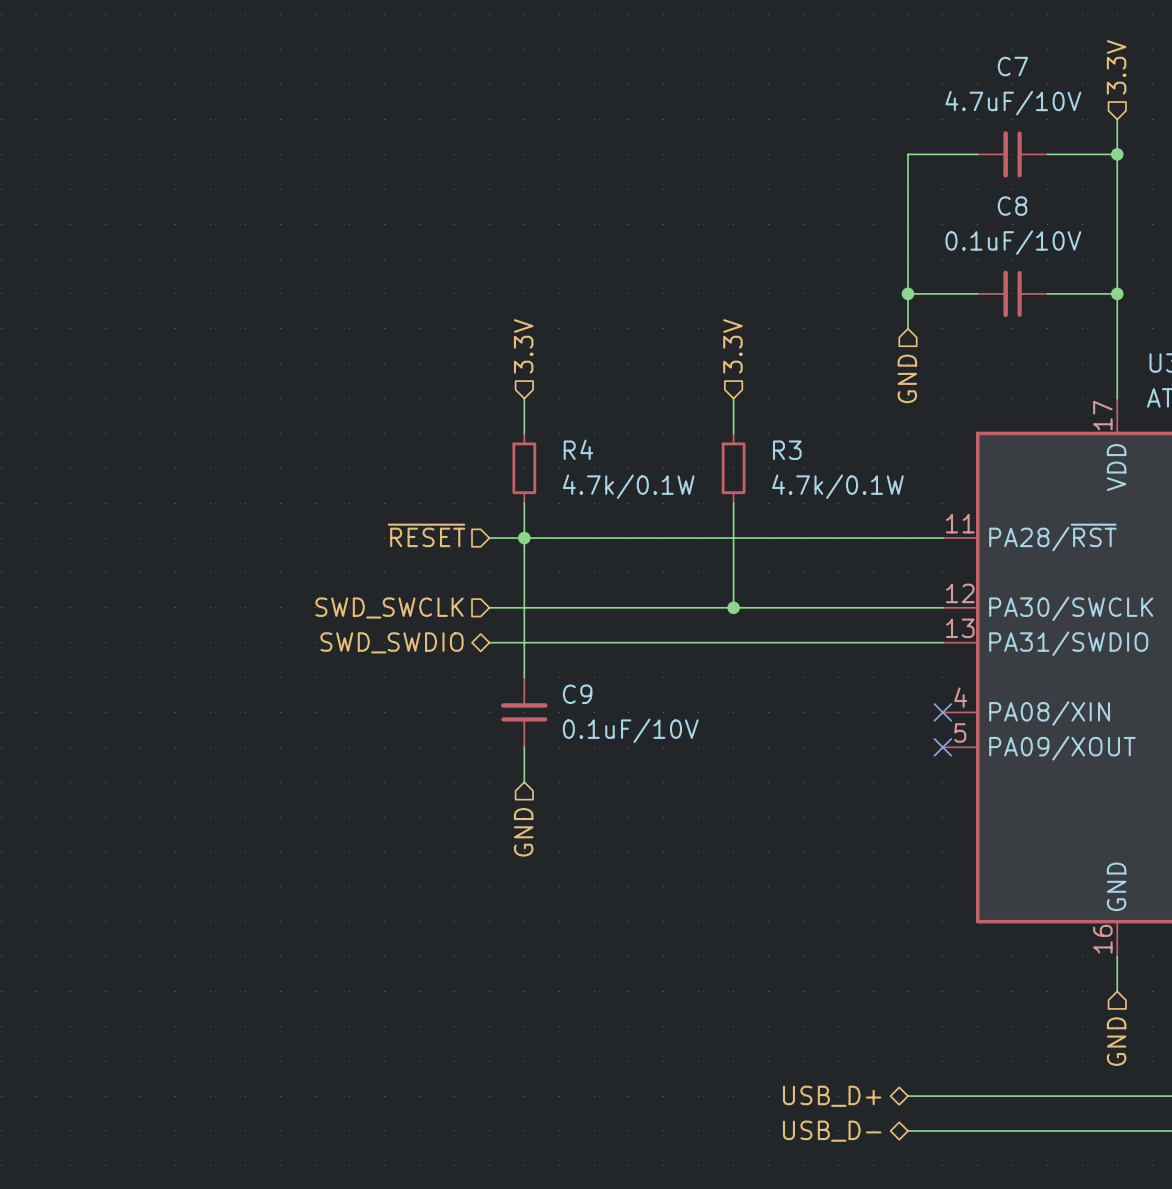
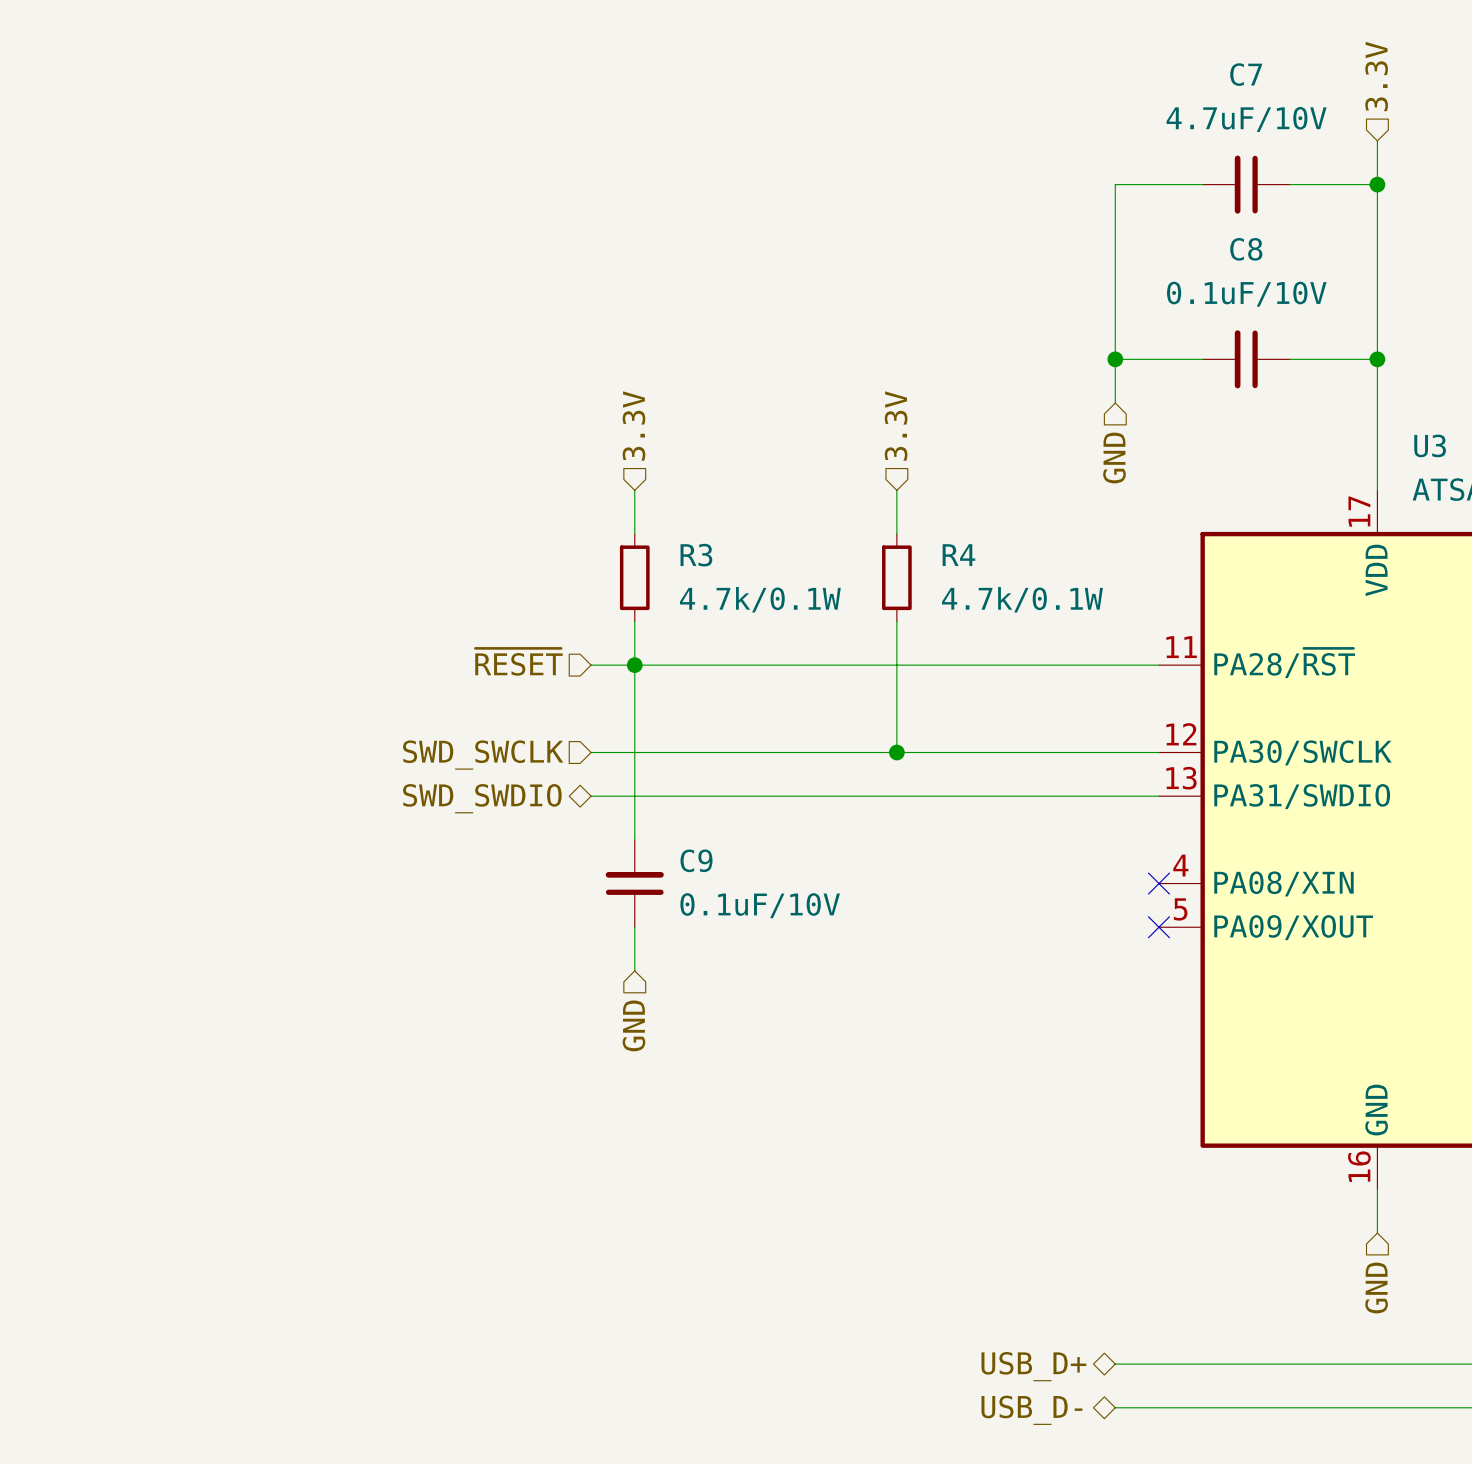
R4 name: R4 (578, 449) -> R3 (696, 555)
R3 name: R3 (787, 450) -> R4 (958, 555)

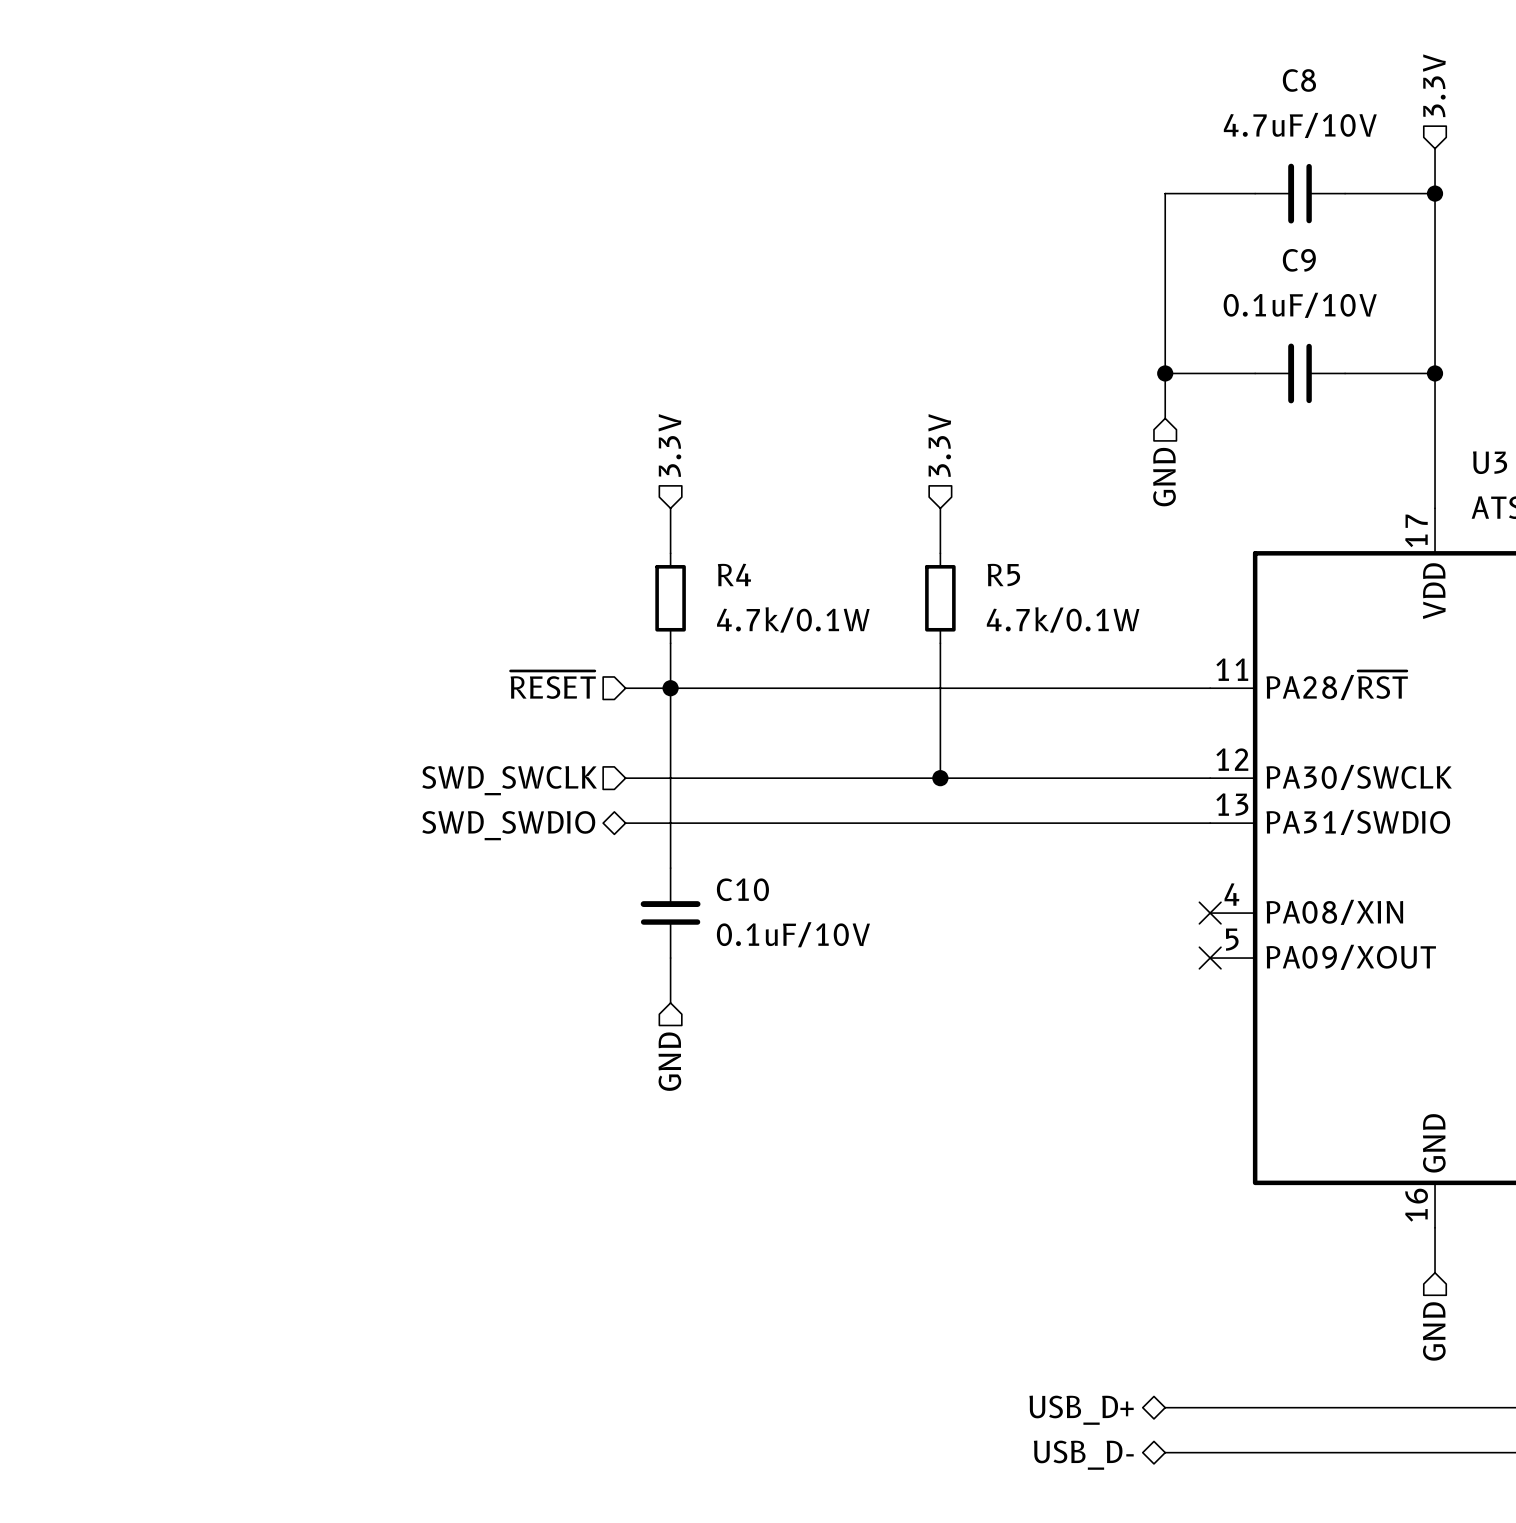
C7 name: C7 (1246, 74) -> C8 (1299, 80)
C8 name: C8 (1246, 249) -> C9 (1299, 260)
R3 name: R3 (696, 555) -> R4 (734, 574)
R4 name: R4 (958, 555) -> R5 (1003, 575)
C9 name: C9 (696, 860) -> C10 (742, 889)

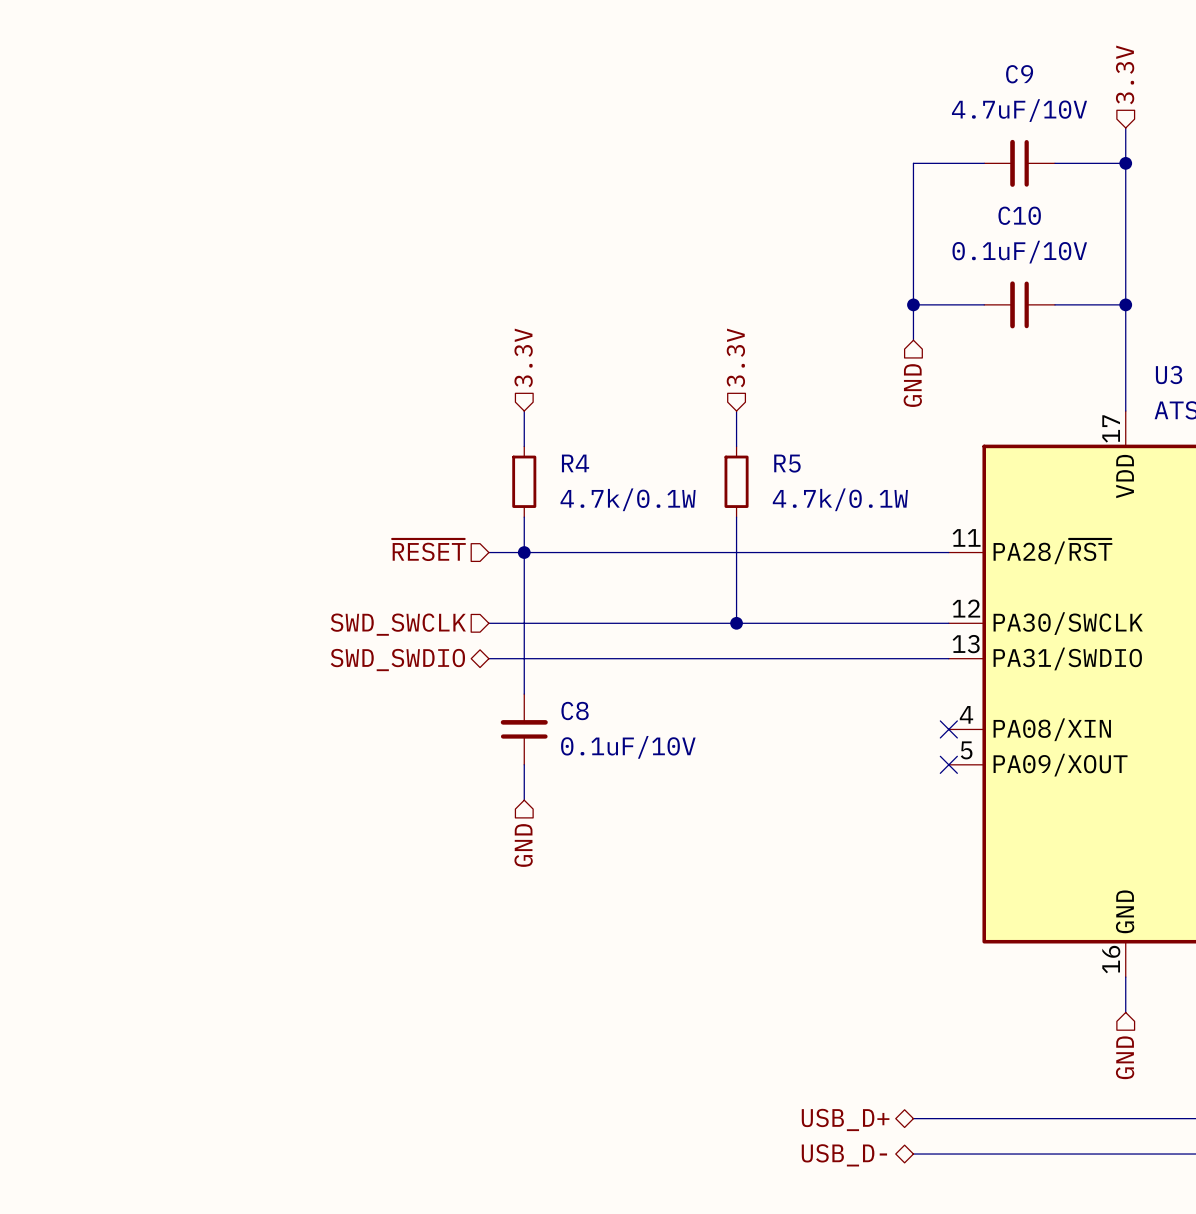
C8 name: C8 (1299, 80) -> C9 (1019, 74)
C9 name: C9 (1299, 260) -> C10 (1019, 215)
C10 name: C10 (742, 889) -> C8 (575, 711)

